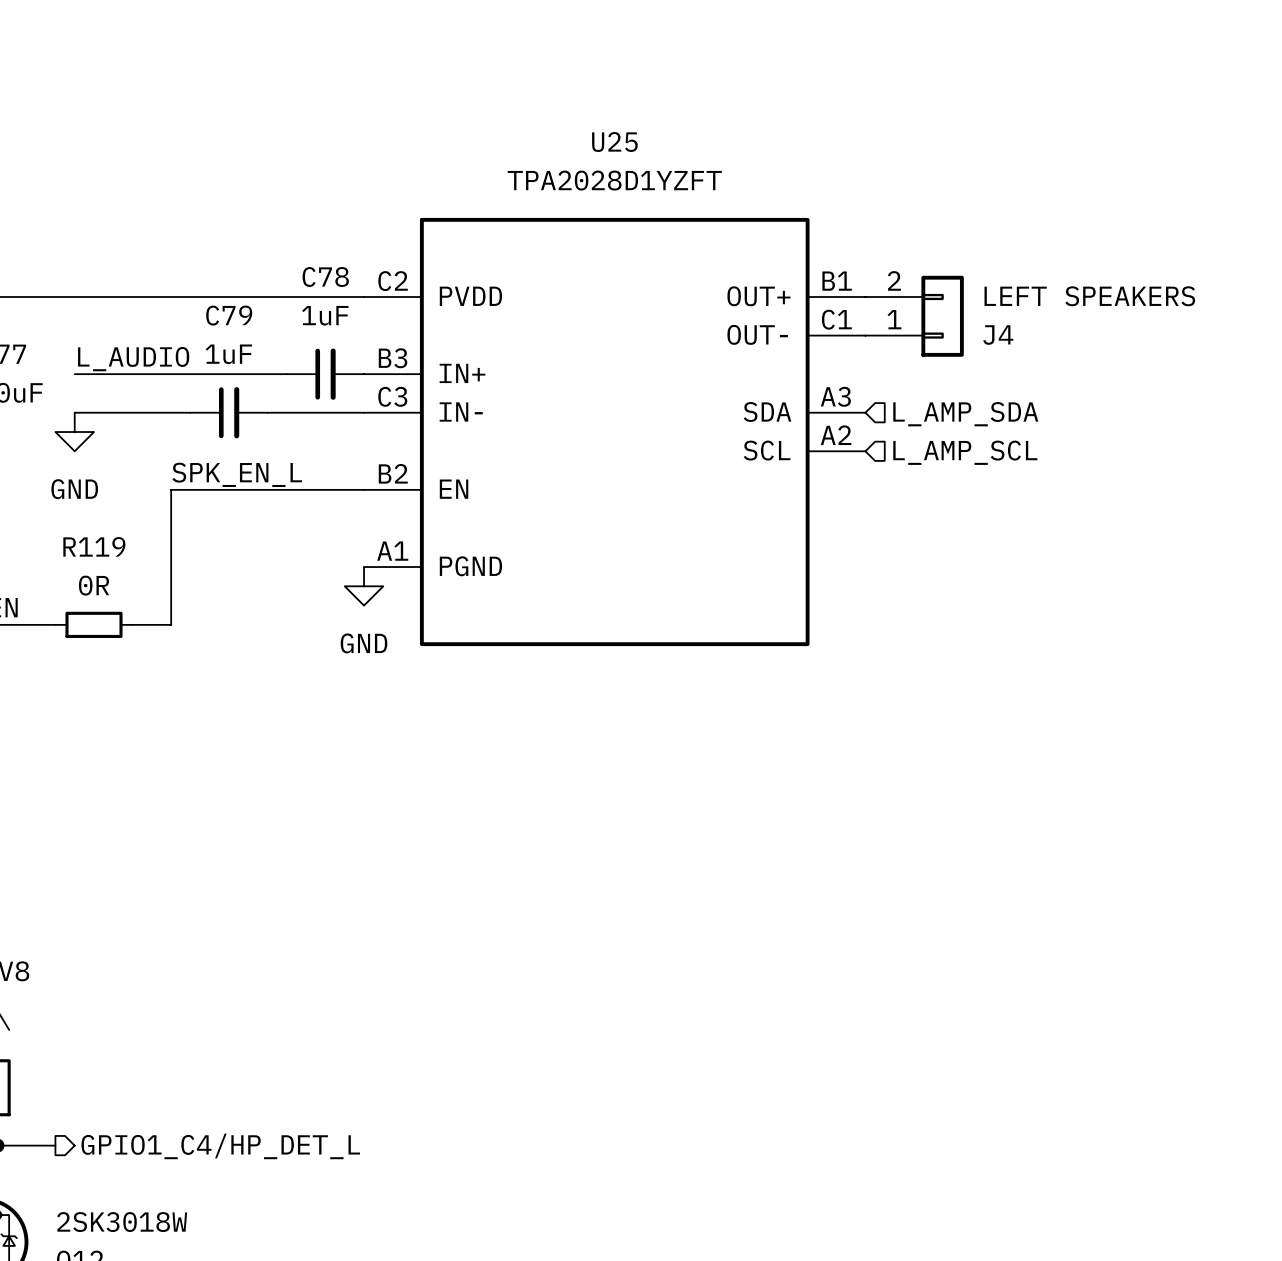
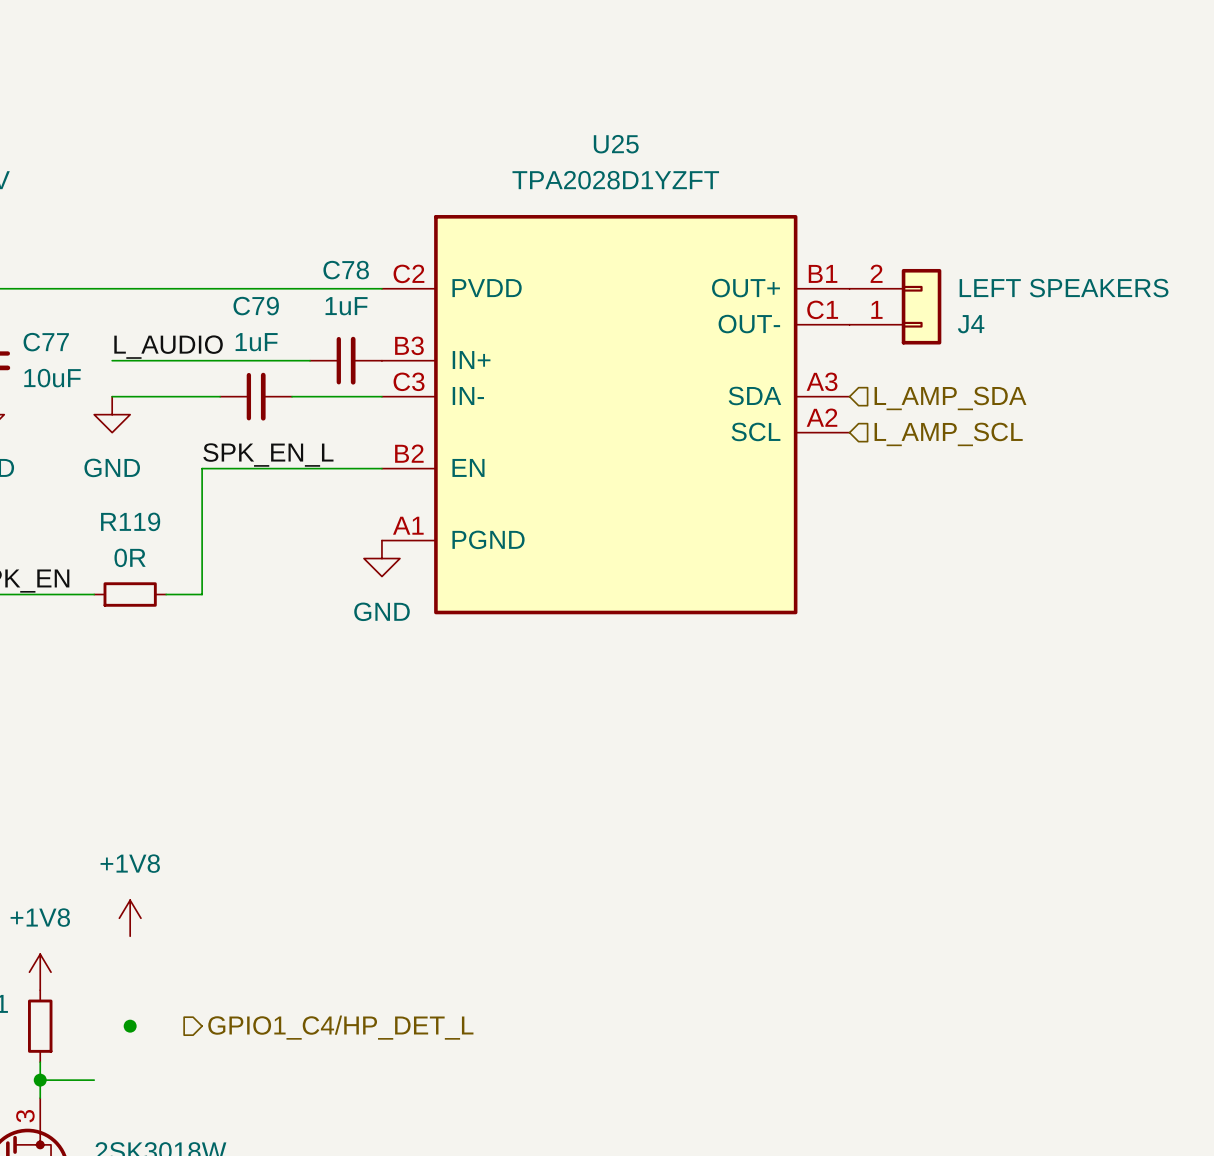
power symbol: none -> +1V8 (130, 918)
junction: none -> (130, 1026)
hierarchical label position: GPIO1_C4/HP_DET_L (220, 1146) -> GPIO1_C4/HP_DET_L (340, 1027)

